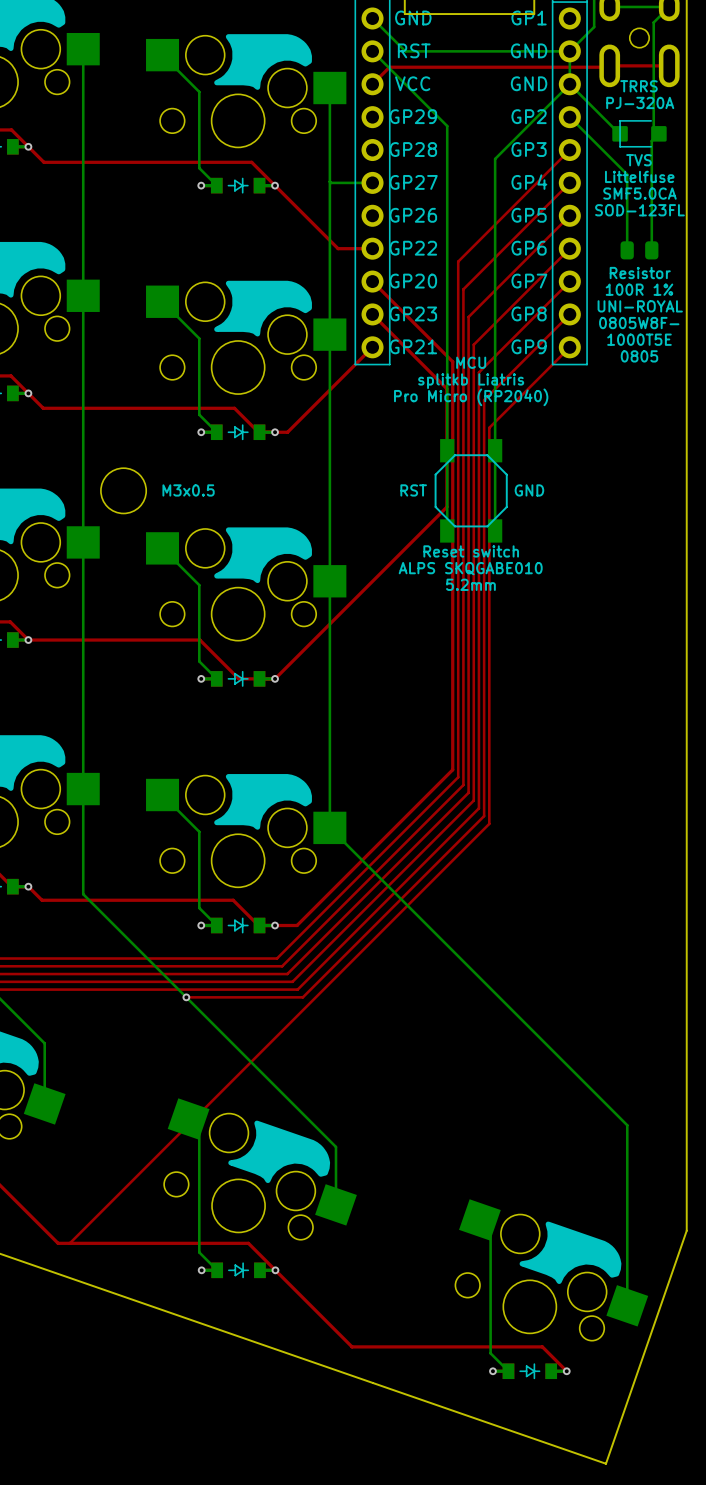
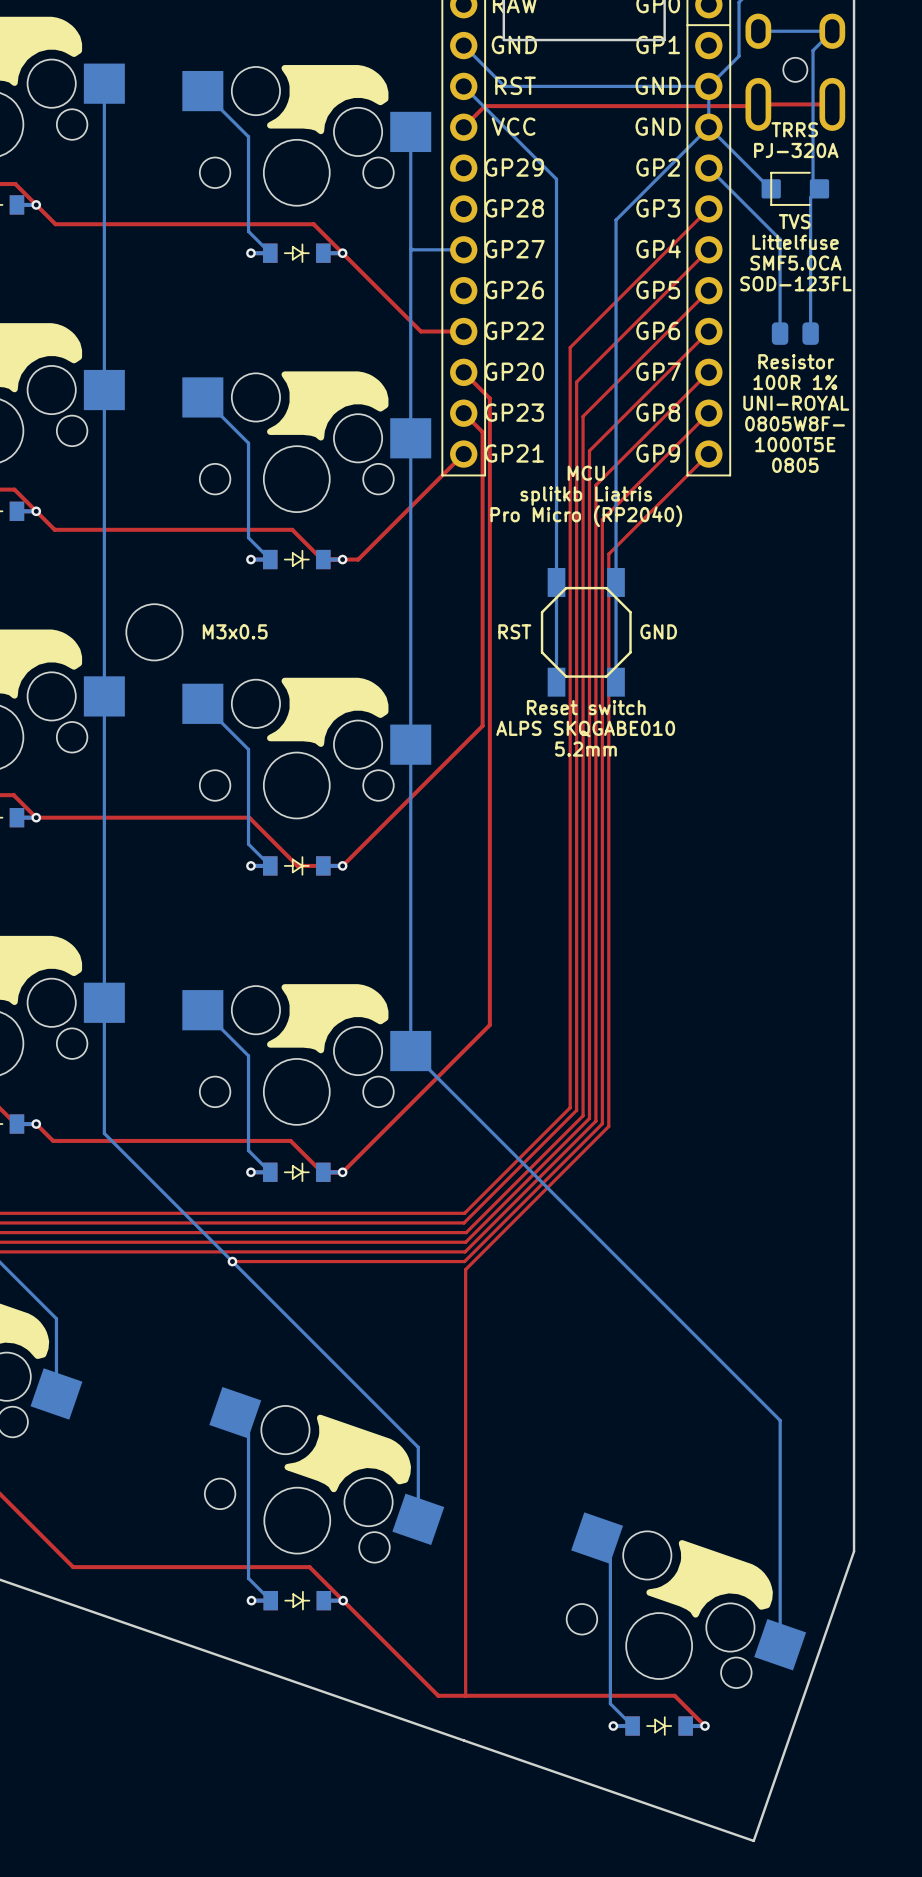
top track: (393, 302) (452, 361) (452, 769) (297, 925) (275, 925) -> (489, 398) (489, 1025) (342, 1172)
top track: (387, 329) (446, 388) (446, 507) (387, 566) -> (482, 432) (482, 725)
top track: (458, 777) (276, 958) -> (570, 988) (570, 1107) (464, 1213) (345, 1213)
top track: (463, 785) (282, 966) -> (576, 997) (576, 1110) (464, 1222) (351, 1222)
top track: (468, 792) (287, 974) -> (583, 1007) (583, 1115) (466, 1232) (357, 1232)
top track: (473, 800) (292, 981) -> (589, 1017) (589, 1118) (465, 1242) (364, 1242)
top track: (478, 808) (297, 989) -> (595, 1026) (595, 1121) (465, 1251) (370, 1251)
top track: (484, 816) (302, 997) -> (602, 1036) (602, 1123) (464, 1261) (377, 1261)
top track: (489, 823) (69, 1243) -> (608, 1046) (608, 1126) (465, 1269) (465, 1695)

